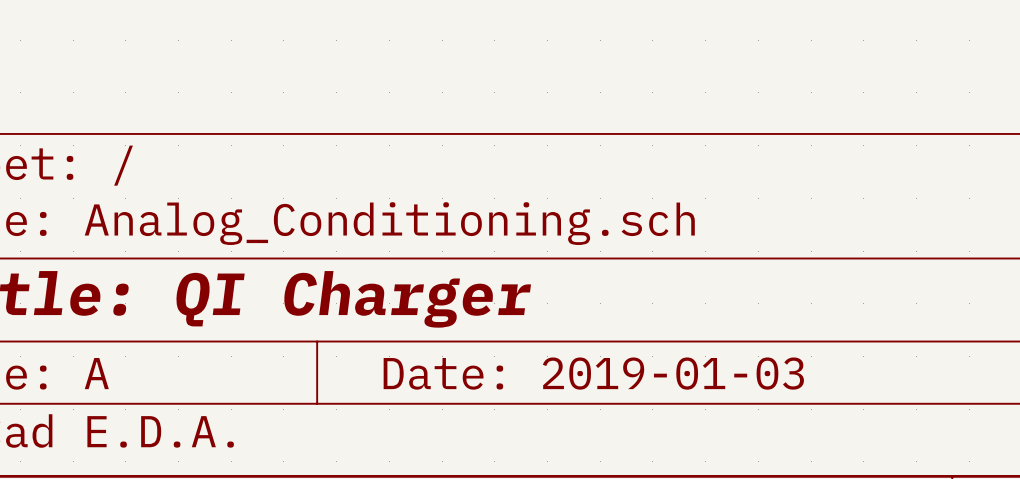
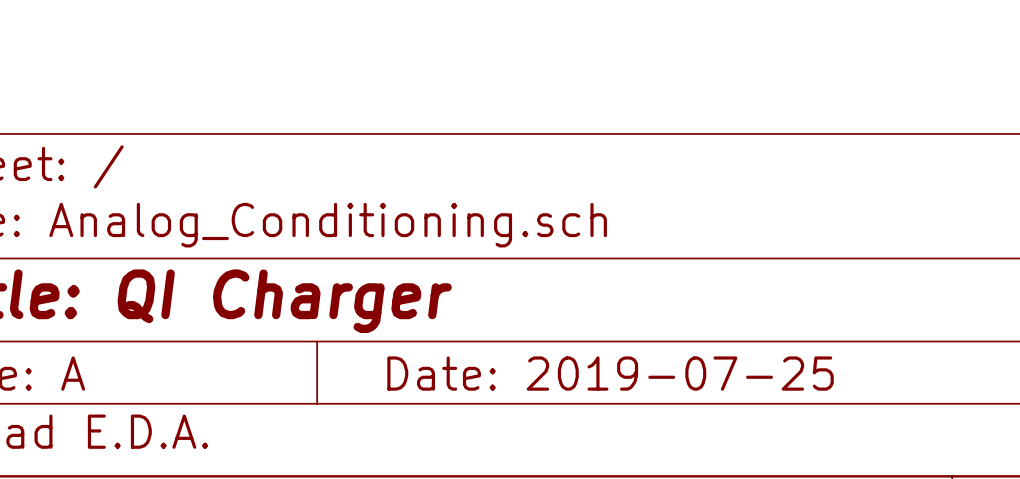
title block: Date: 2019-01-03 (593, 373) -> Date: 2019-07-25 (610, 373)

